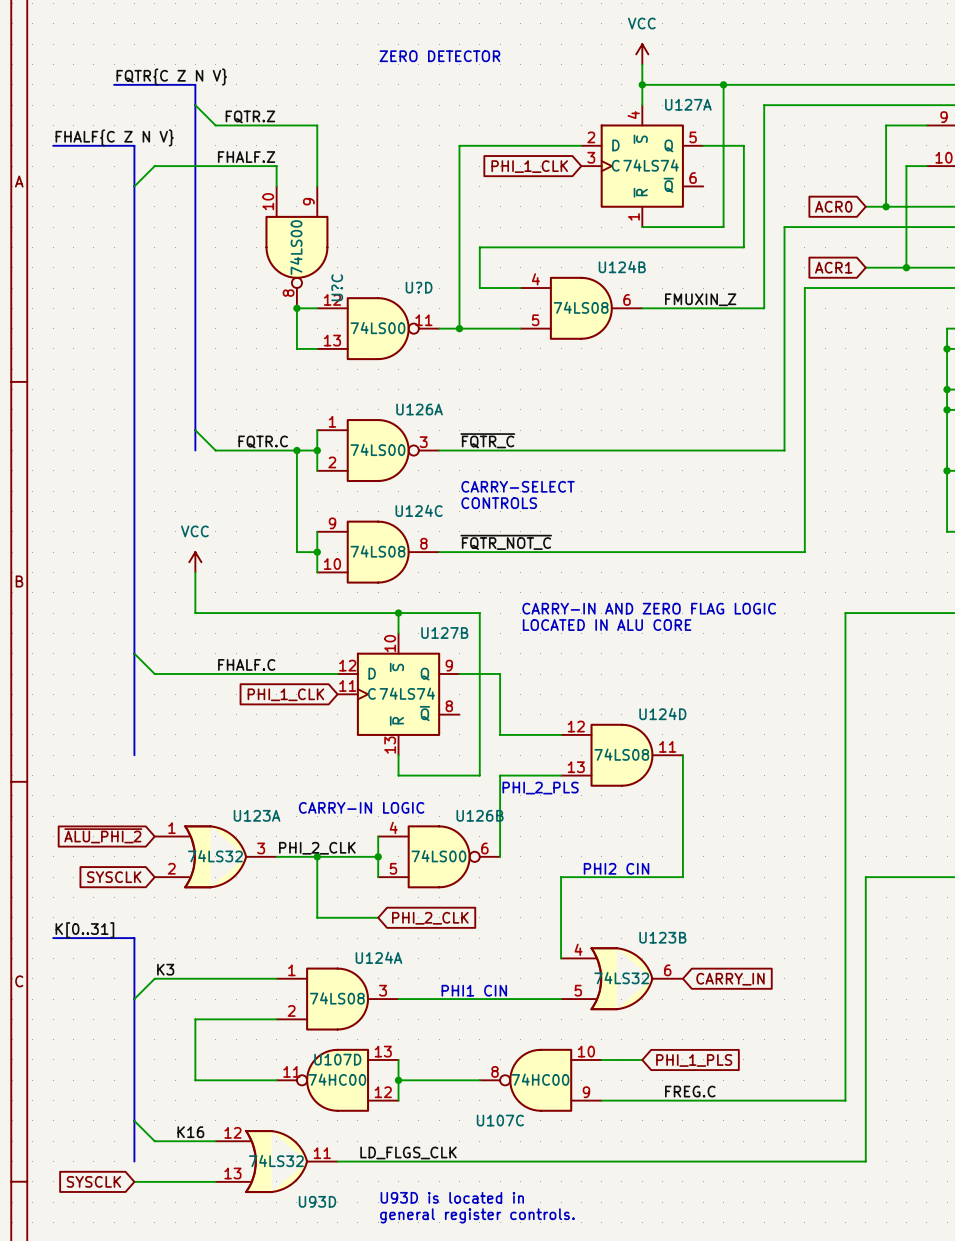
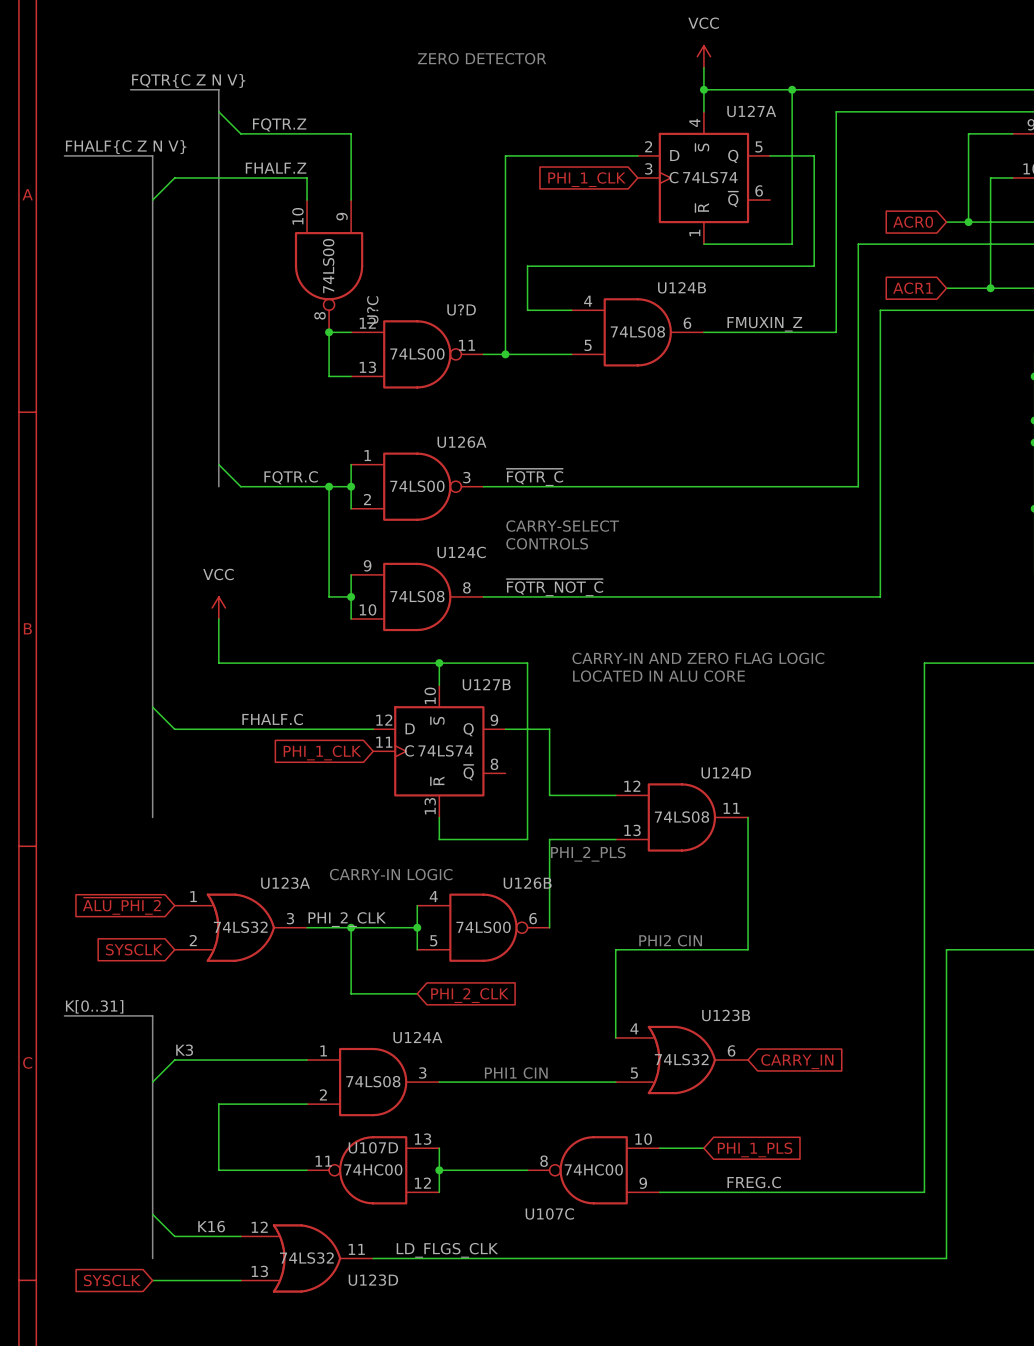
text: U93D is located in (452, 1197) -> none
U93D name: U93D (317, 1201) -> U123D (373, 1280)
text: general register controls. (477, 1215) -> none

